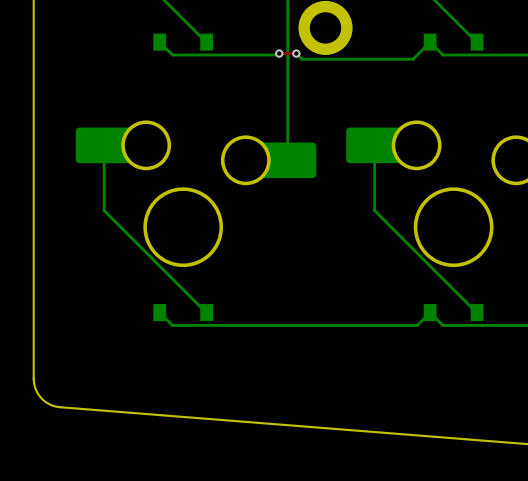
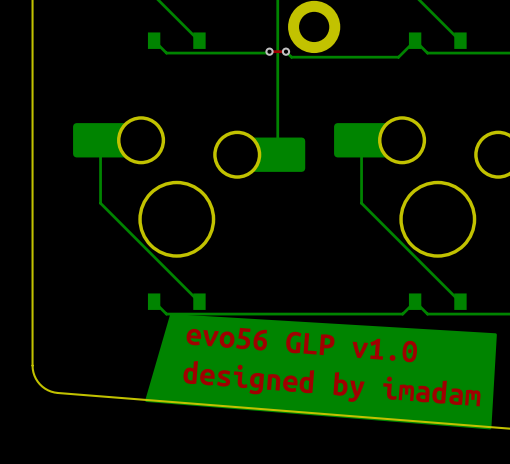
drawing: none -> [145, 314, 497, 430]

